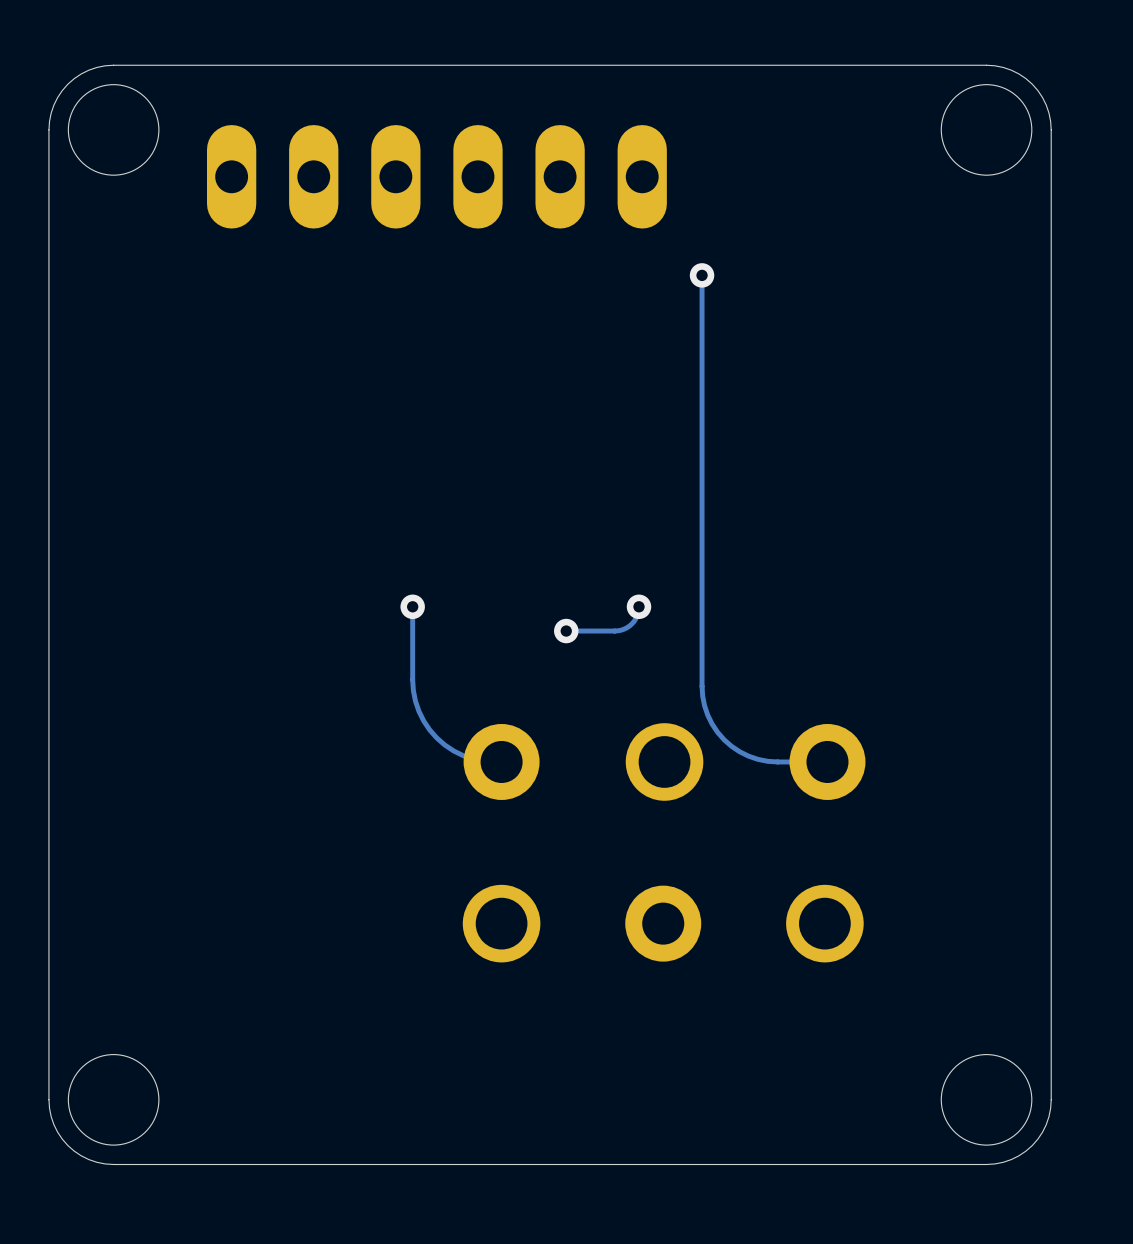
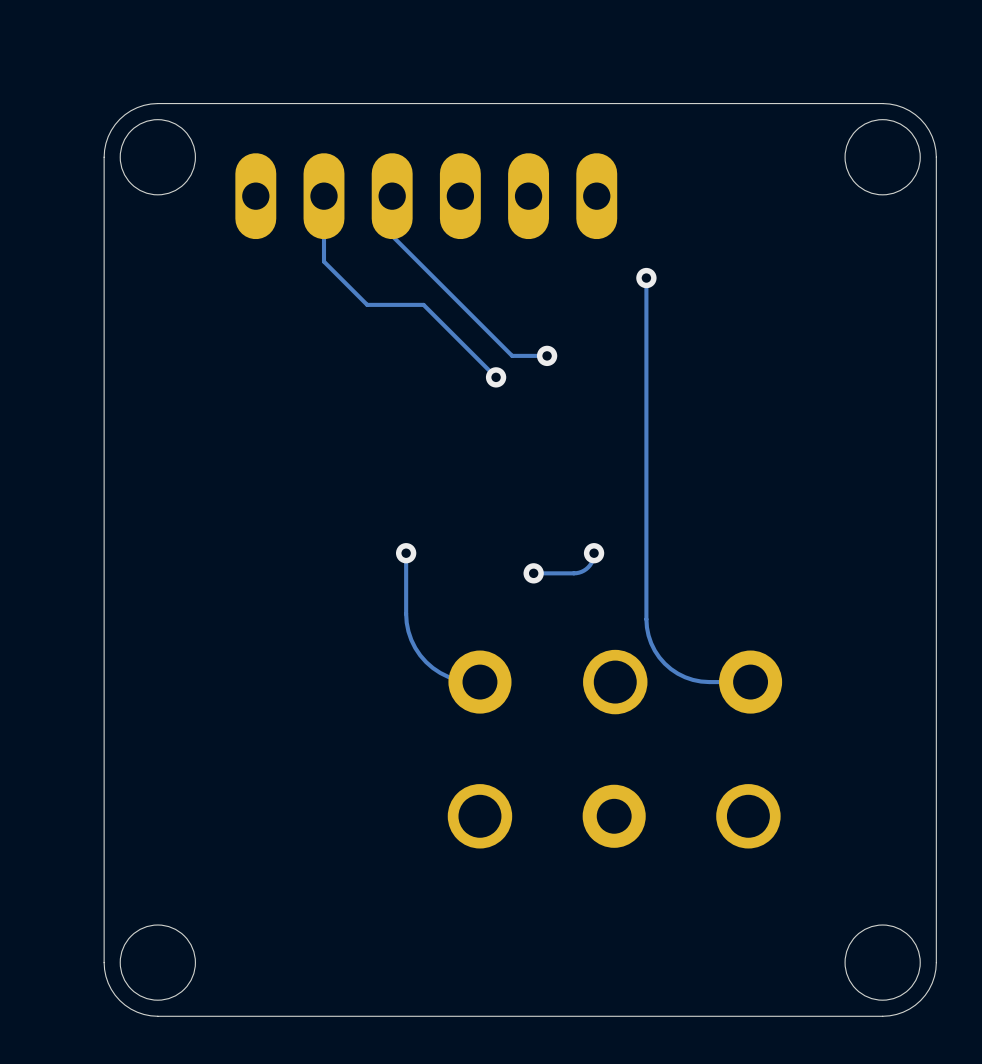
track: none -> (324, 196) (324, 261) (367, 304) (423, 304) (496, 377)
track: none -> (392, 196) (392, 235) (512, 355) (547, 355)
via: none -> (547, 355)
via: none -> (496, 377)

